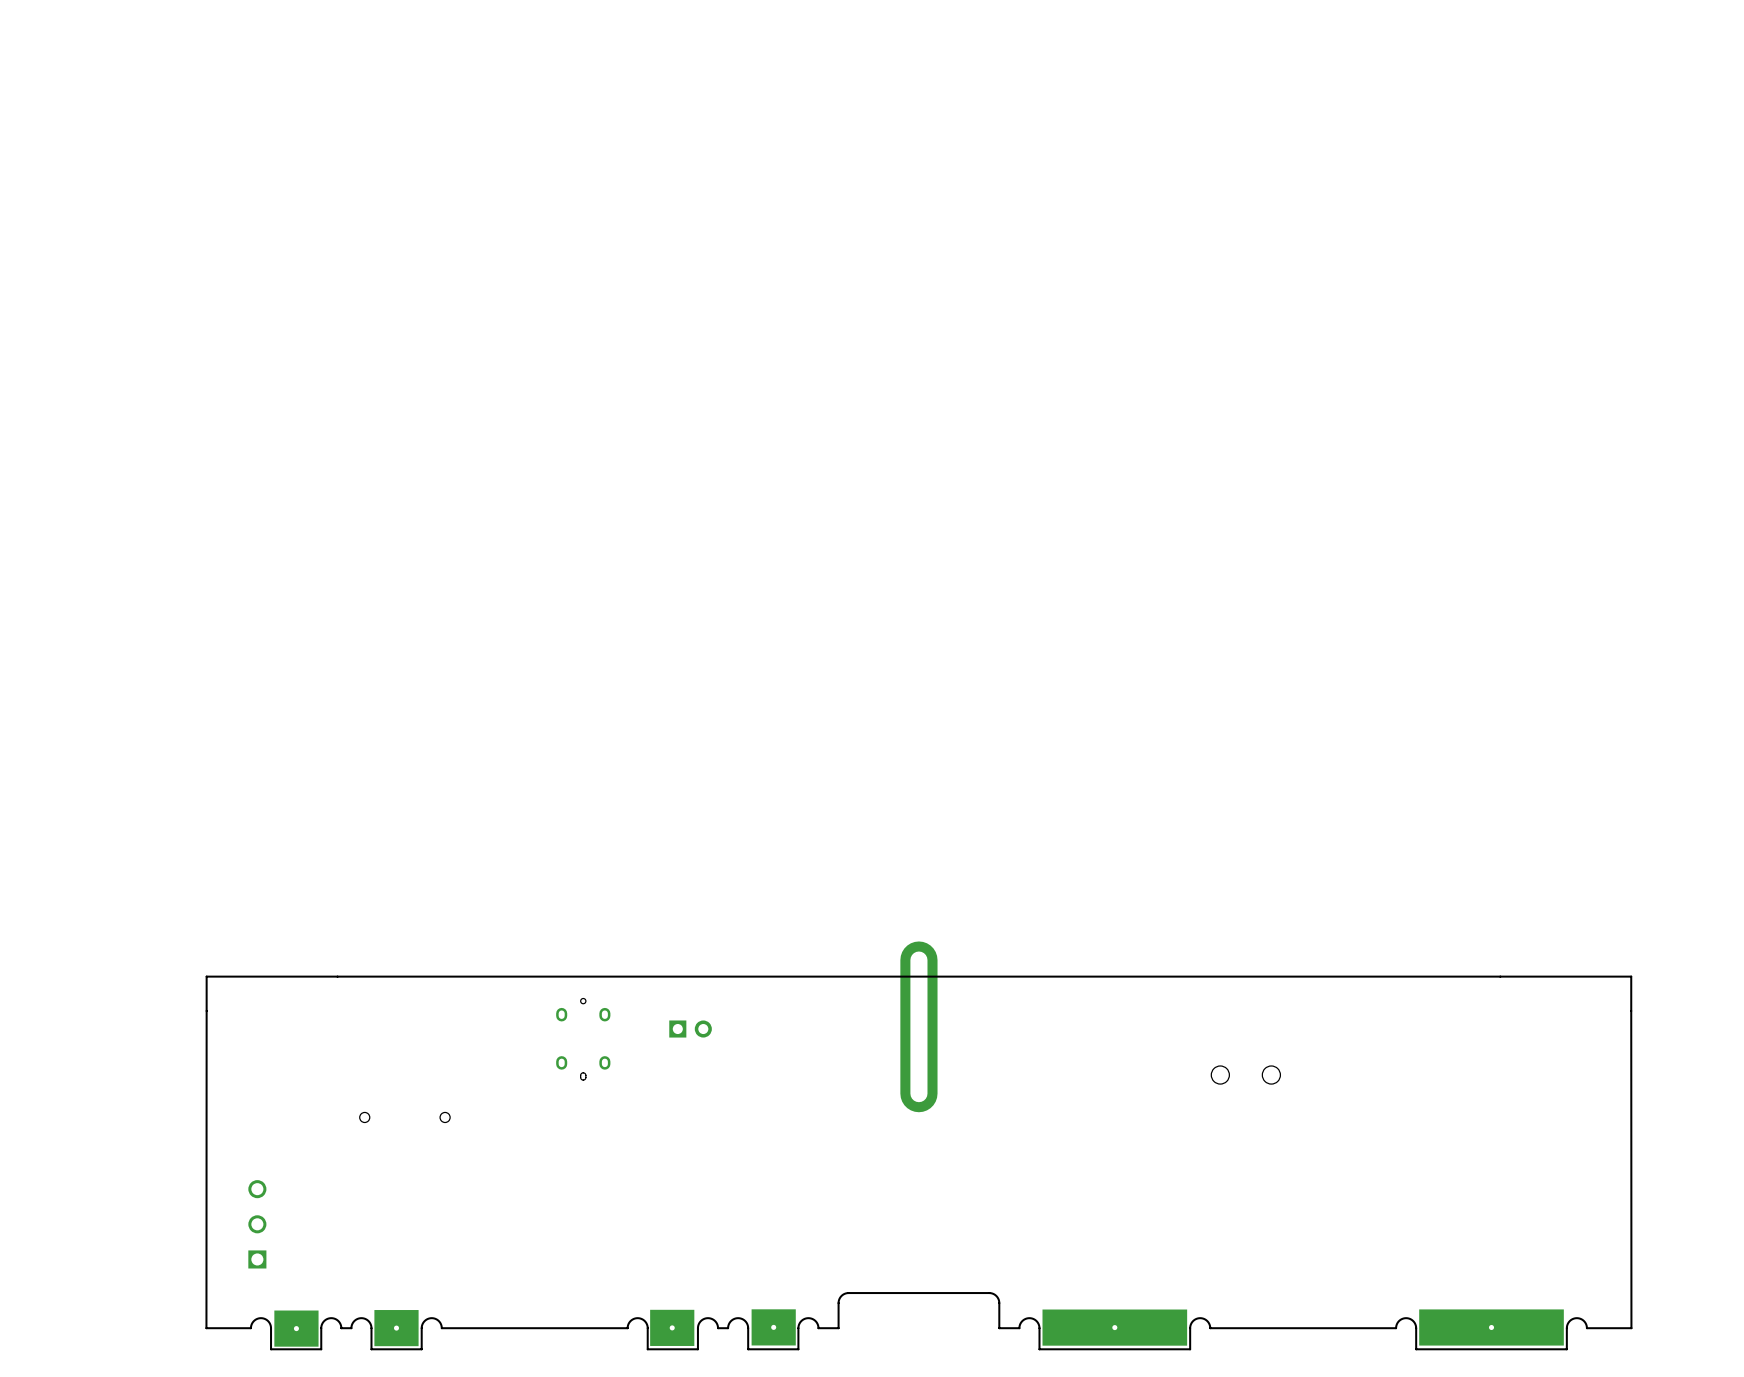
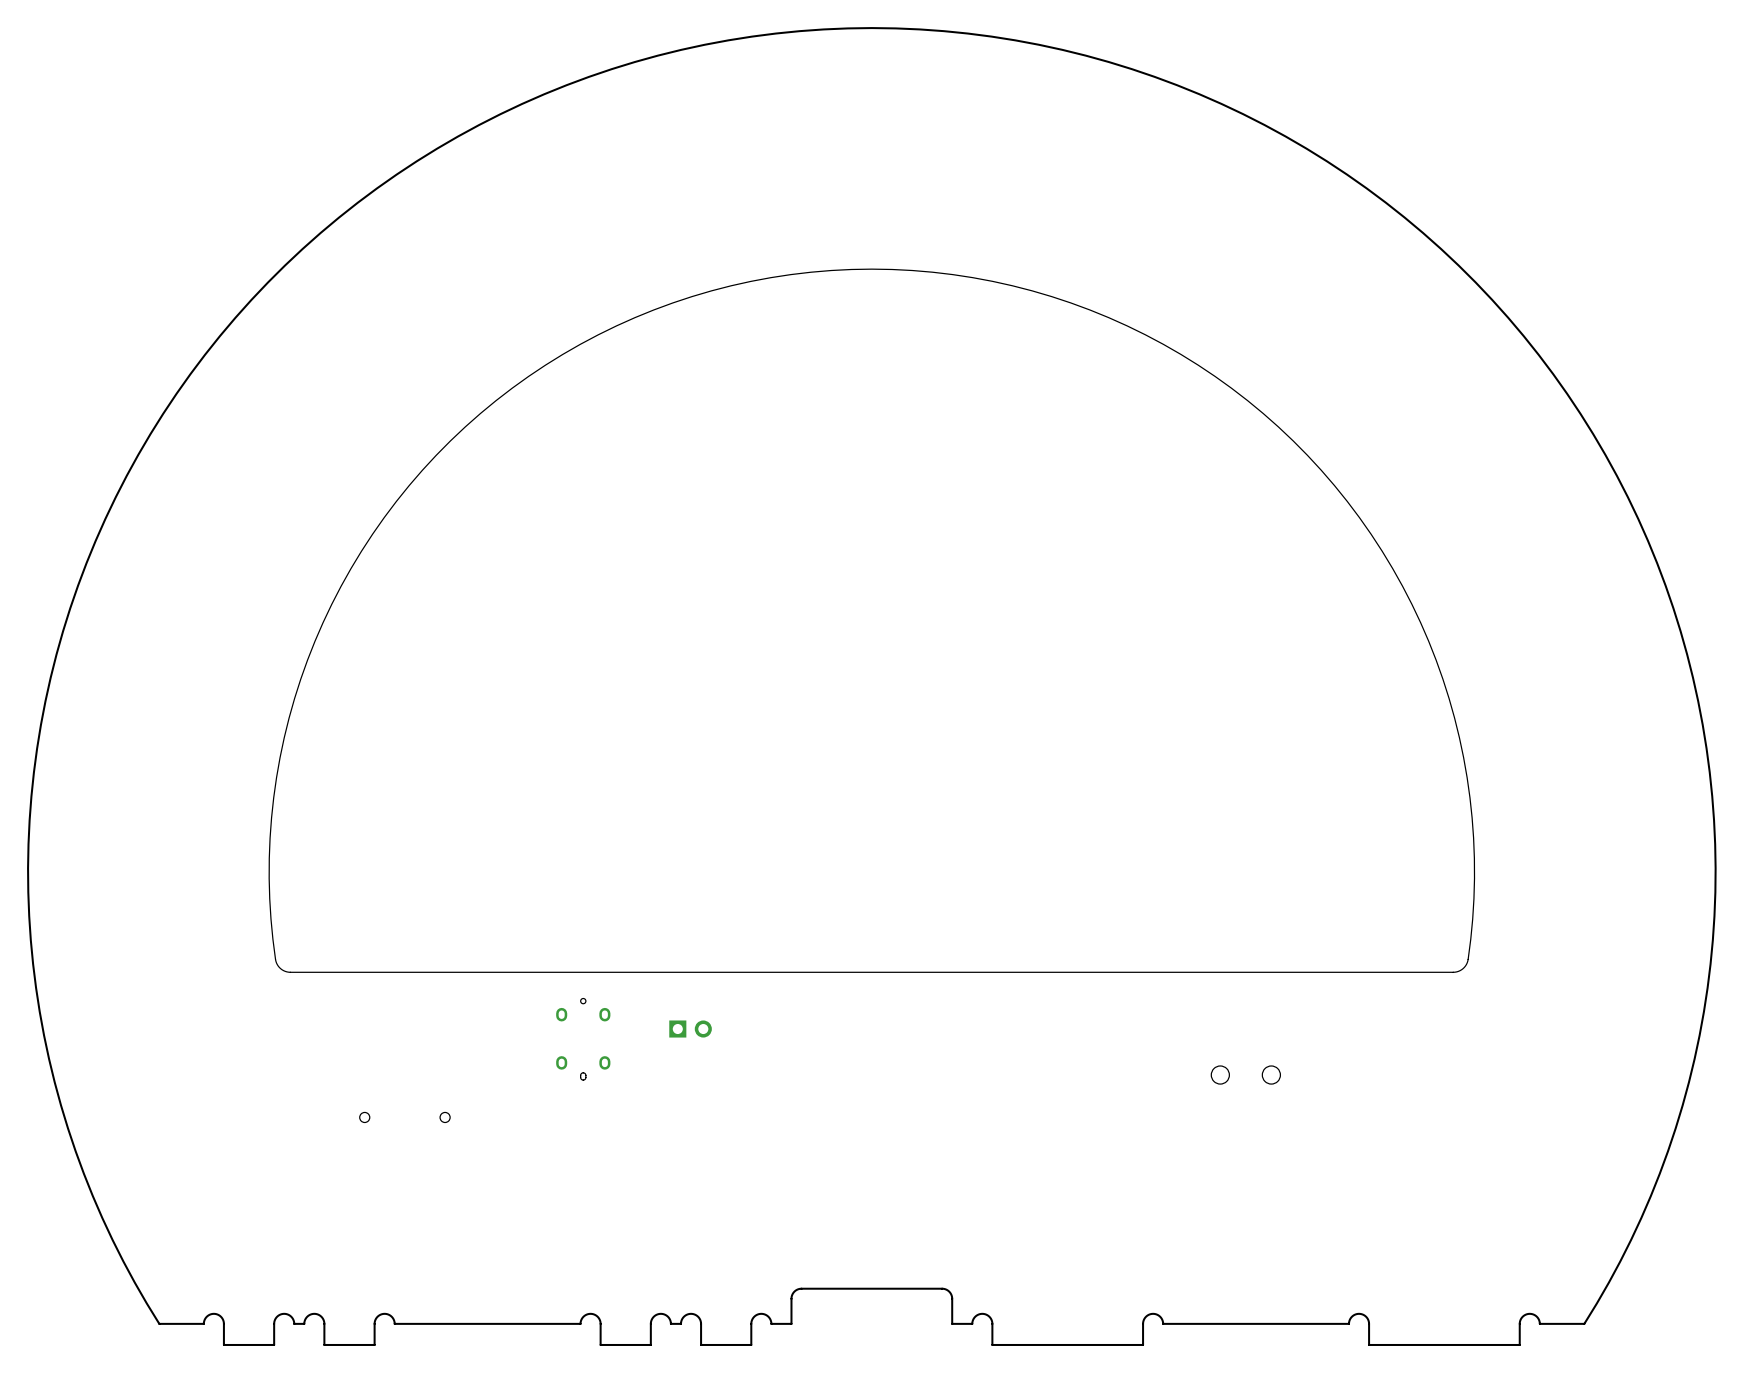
board edge: none -> (1468, 959) (1473, 898) (1473, 838) (1467, 777) (1454, 718) (1436, 660) (1420, 622) (1392, 568) (1359, 517) (1321, 470) (1278, 426) (1231, 388) (1180, 354) (1127, 325) (1070, 302) (1012, 285) (952, 274) (892, 269) (831, 270) (770, 277) (711, 290) (653, 309) (598, 334) (562, 354) (512, 388) (465, 426) (422, 470) (384, 517) (351, 568) (331, 604) (307, 660) (289, 718) (276, 777) (269, 858) (270, 919) (275, 961) (280, 968) (288, 972) (1453, 972) (1463, 968) (1468, 959)
board edge: (1631, 976) (1631, 1328) (1586, 1328) (1583, 1320) (1574, 1318) (1567, 1325) (1566, 1349) (1416, 1349) (1415, 1325) (1412, 1320) (1406, 1318) (1399, 1321) (1396, 1328) (1210, 1328) (1206, 1320) (1198, 1318) (1194, 1320) (1190, 1325) (1190, 1349) (1039, 1349) (1039, 1326) (1036, 1321) (1028, 1318) (1021, 1322) (1019, 1328) (999, 1328) (999, 1300) (995, 1295) (989, 1293) (845, 1293) (838, 1300) (838, 1328) (818, 1328) (814, 1319) (803, 1319) (798, 1326) (798, 1349) (748, 1349) (747, 1325) (744, 1320) (738, 1318) (731, 1321) (728, 1328) (718, 1328) (716, 1322) (711, 1318) (702, 1319) (698, 1326) (697, 1349) (647, 1349) (647, 1325) (643, 1320) (637, 1318) (630, 1321) (627, 1328) (441, 1328) (437, 1320) (430, 1318) (425, 1320) (422, 1325) (421, 1349) (371, 1349) (371, 1325) (367, 1320) (362, 1318) (355, 1320) (351, 1328) (341, 1328) (339, 1322) (334, 1318) (325, 1319) (321, 1326) (321, 1349) (271, 1349) (270, 1325) (267, 1320) (262, 1318) (254, 1320) (250, 1328) (206, 1328) (206, 976) (1631, 976) -> none
part: (918, 1026) -> none
part: (257, 1224) -> none
board edge: none -> (942, 1288) (798, 1289) (791, 1296) (791, 1323) (771, 1323) (766, 1314) (756, 1314) (751, 1322) (751, 1344) (701, 1344) (700, 1321) (697, 1315) (691, 1313) (683, 1316) (680, 1323) (670, 1323) (669, 1318) (664, 1314) (655, 1315) (650, 1322) (650, 1344) (600, 1344) (600, 1321) (596, 1315) (590, 1313) (583, 1316) (580, 1323) (394, 1323) (391, 1316) (383, 1313) (377, 1316) (374, 1321) (374, 1344) (324, 1344) (324, 1322) (320, 1315) (311, 1314) (306, 1317) (304, 1323) (294, 1323) (290, 1316) (282, 1313) (277, 1316) (274, 1321) (274, 1344) (223, 1344) (223, 1322) (220, 1315) (213, 1313) (208, 1315) (203, 1323) (159, 1323) (134, 1282) (102, 1218) (75, 1151) (54, 1082) (39, 1011) (29, 916) (28, 844) (33, 772) (45, 701) (63, 631) (95, 540) (138, 454) (176, 393) (235, 317) (285, 265) (357, 202) (416, 161) (500, 114) (566, 85) (657, 55) (728, 40) (823, 29) (895, 28) (967, 33) (1062, 49) (1131, 69) (1221, 103) (1306, 148) (1366, 188) (1423, 233) (1475, 282) (1538, 354) (1580, 413) (1627, 497) (1657, 563) (1687, 654) (1702, 724) (1712, 796) (1715, 892) (1710, 964) (1699, 1035) (1682, 1105) (1659, 1173) (1631, 1239) (1584, 1323) (1539, 1323) (1536, 1316) (1528, 1313) (1522, 1316) (1520, 1321) (1519, 1344) (1369, 1344) (1368, 1321) (1366, 1316) (1360, 1313) (1351, 1316) (1348, 1323) (1163, 1323) (1160, 1316) (1153, 1313) (1146, 1315) (1143, 1321) (1143, 1344) (992, 1344) (992, 1322) (989, 1316) (981, 1313) (974, 1317) (972, 1323) (952, 1323) (951, 1296) (948, 1290) (942, 1288)
part: (672, 1327) -> none
part: (773, 1327) -> none
part: (1114, 1327) -> none
part: (1491, 1327) -> none
part: (296, 1328) -> none
part: (396, 1328) -> none

